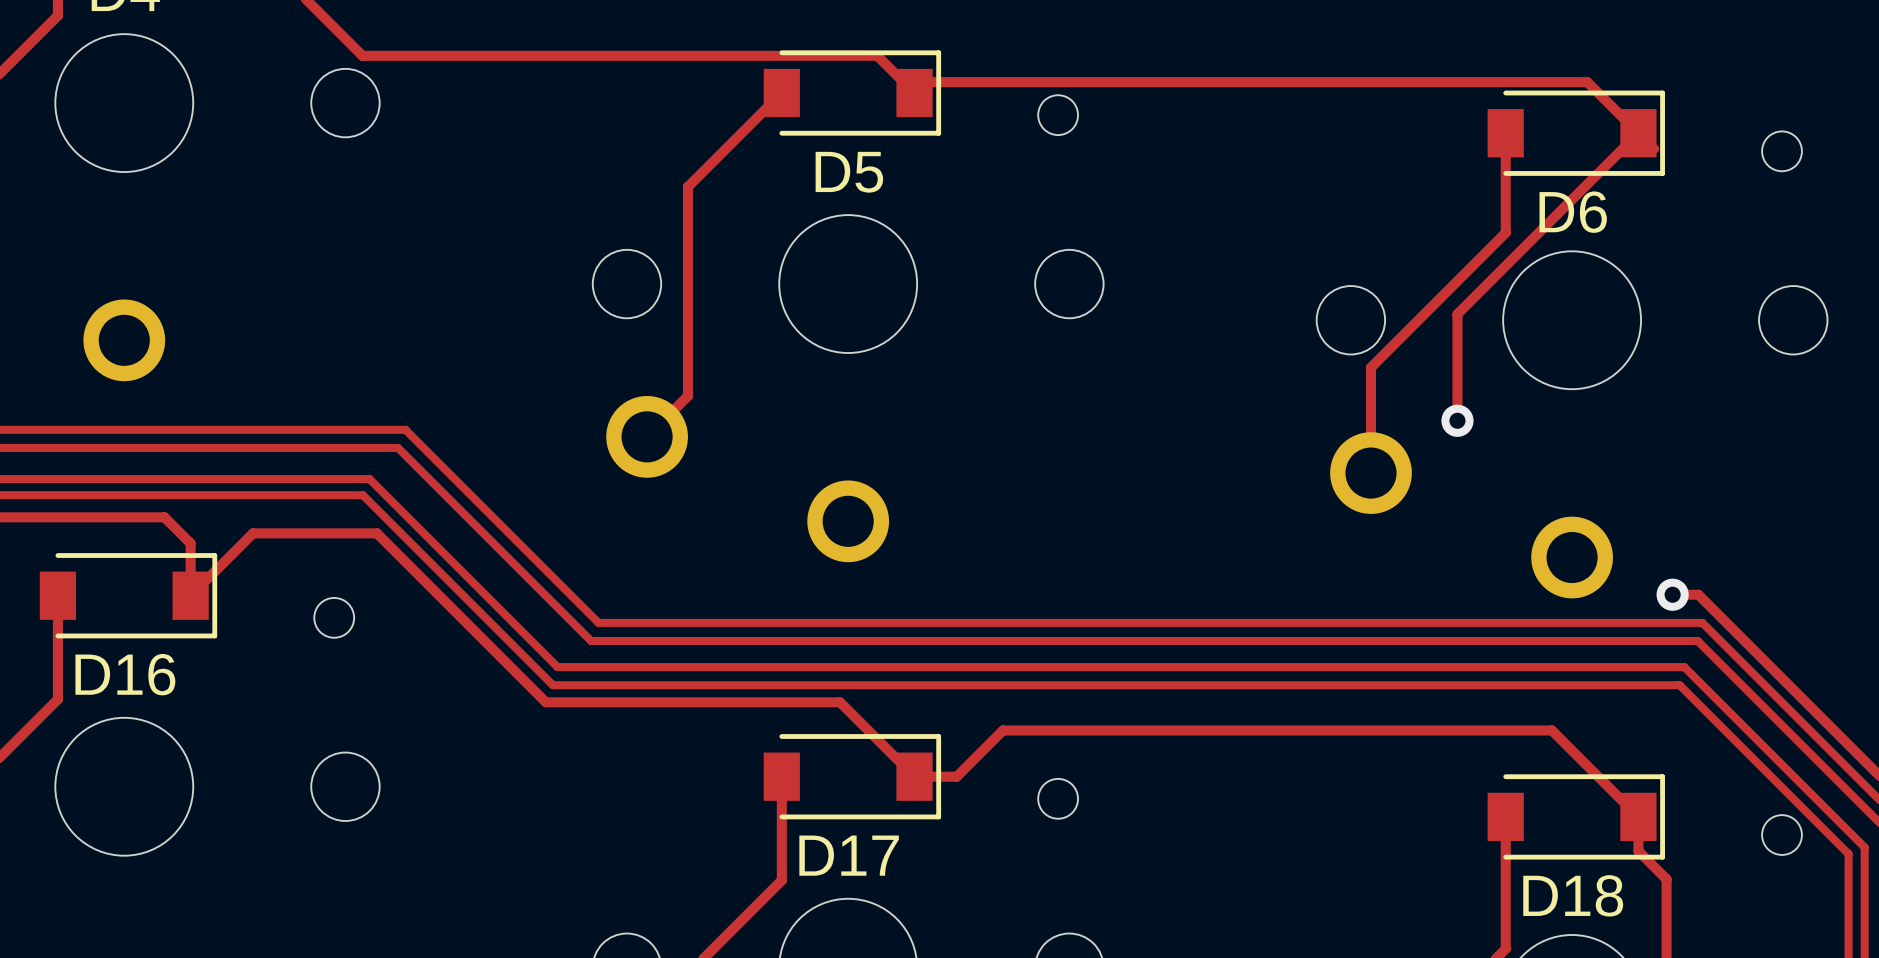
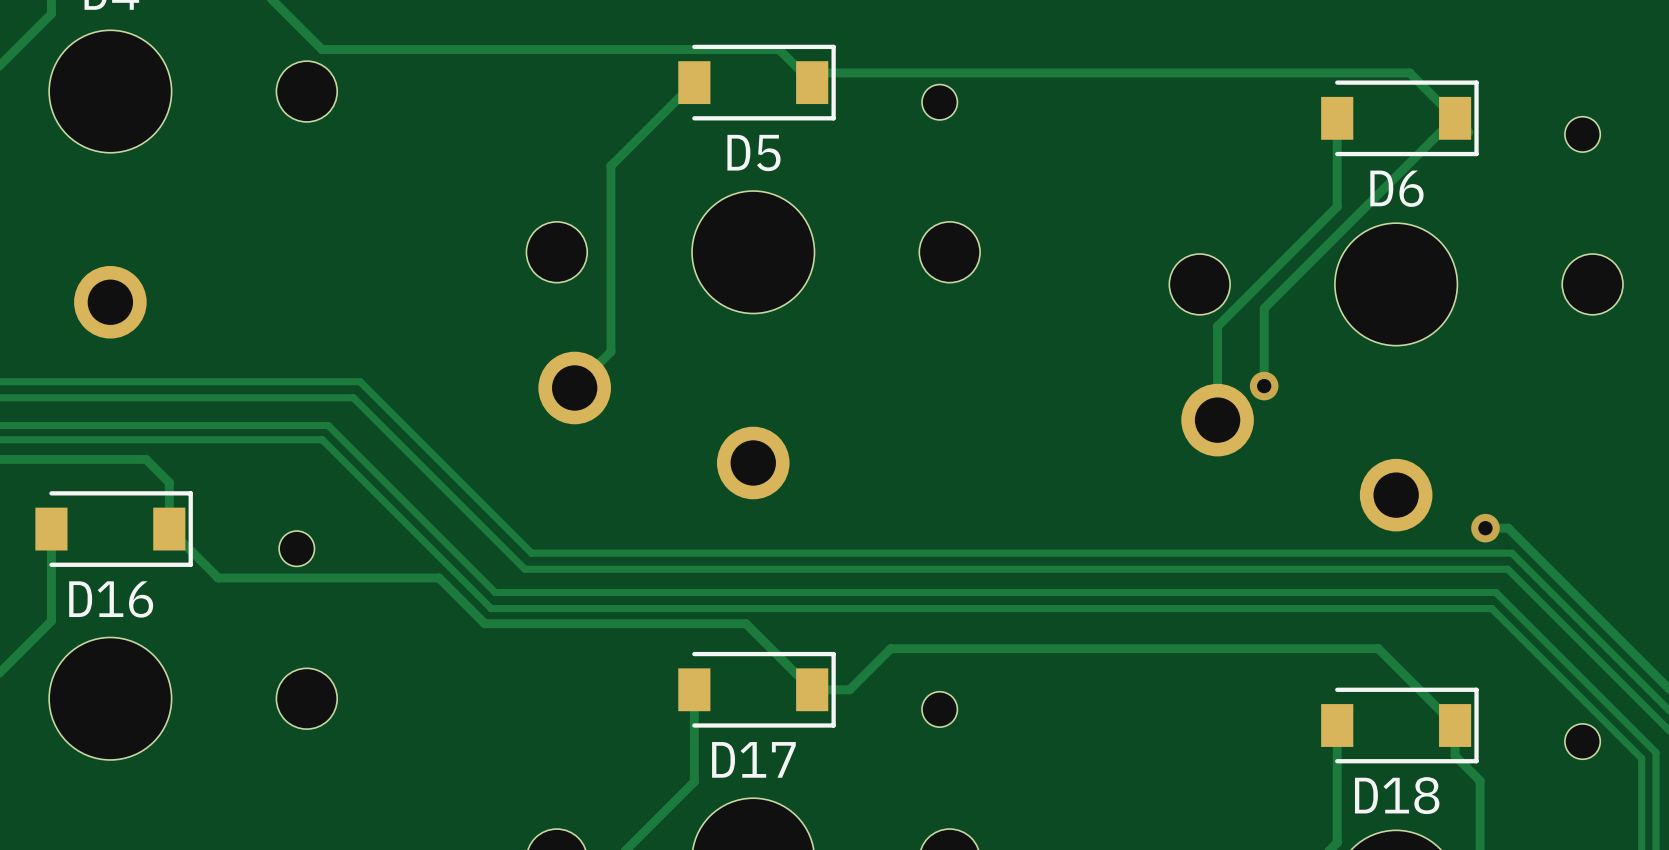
track: (1638, 133) (1457, 314) (1457, 420) -> (1454, 118) (1264, 308) (1264, 386)
via position: (1457, 420) -> (1264, 386)
track: (190, 595) (252, 533) (376, 533) (494, 650) -> (169, 529) (218, 578) (439, 578)

